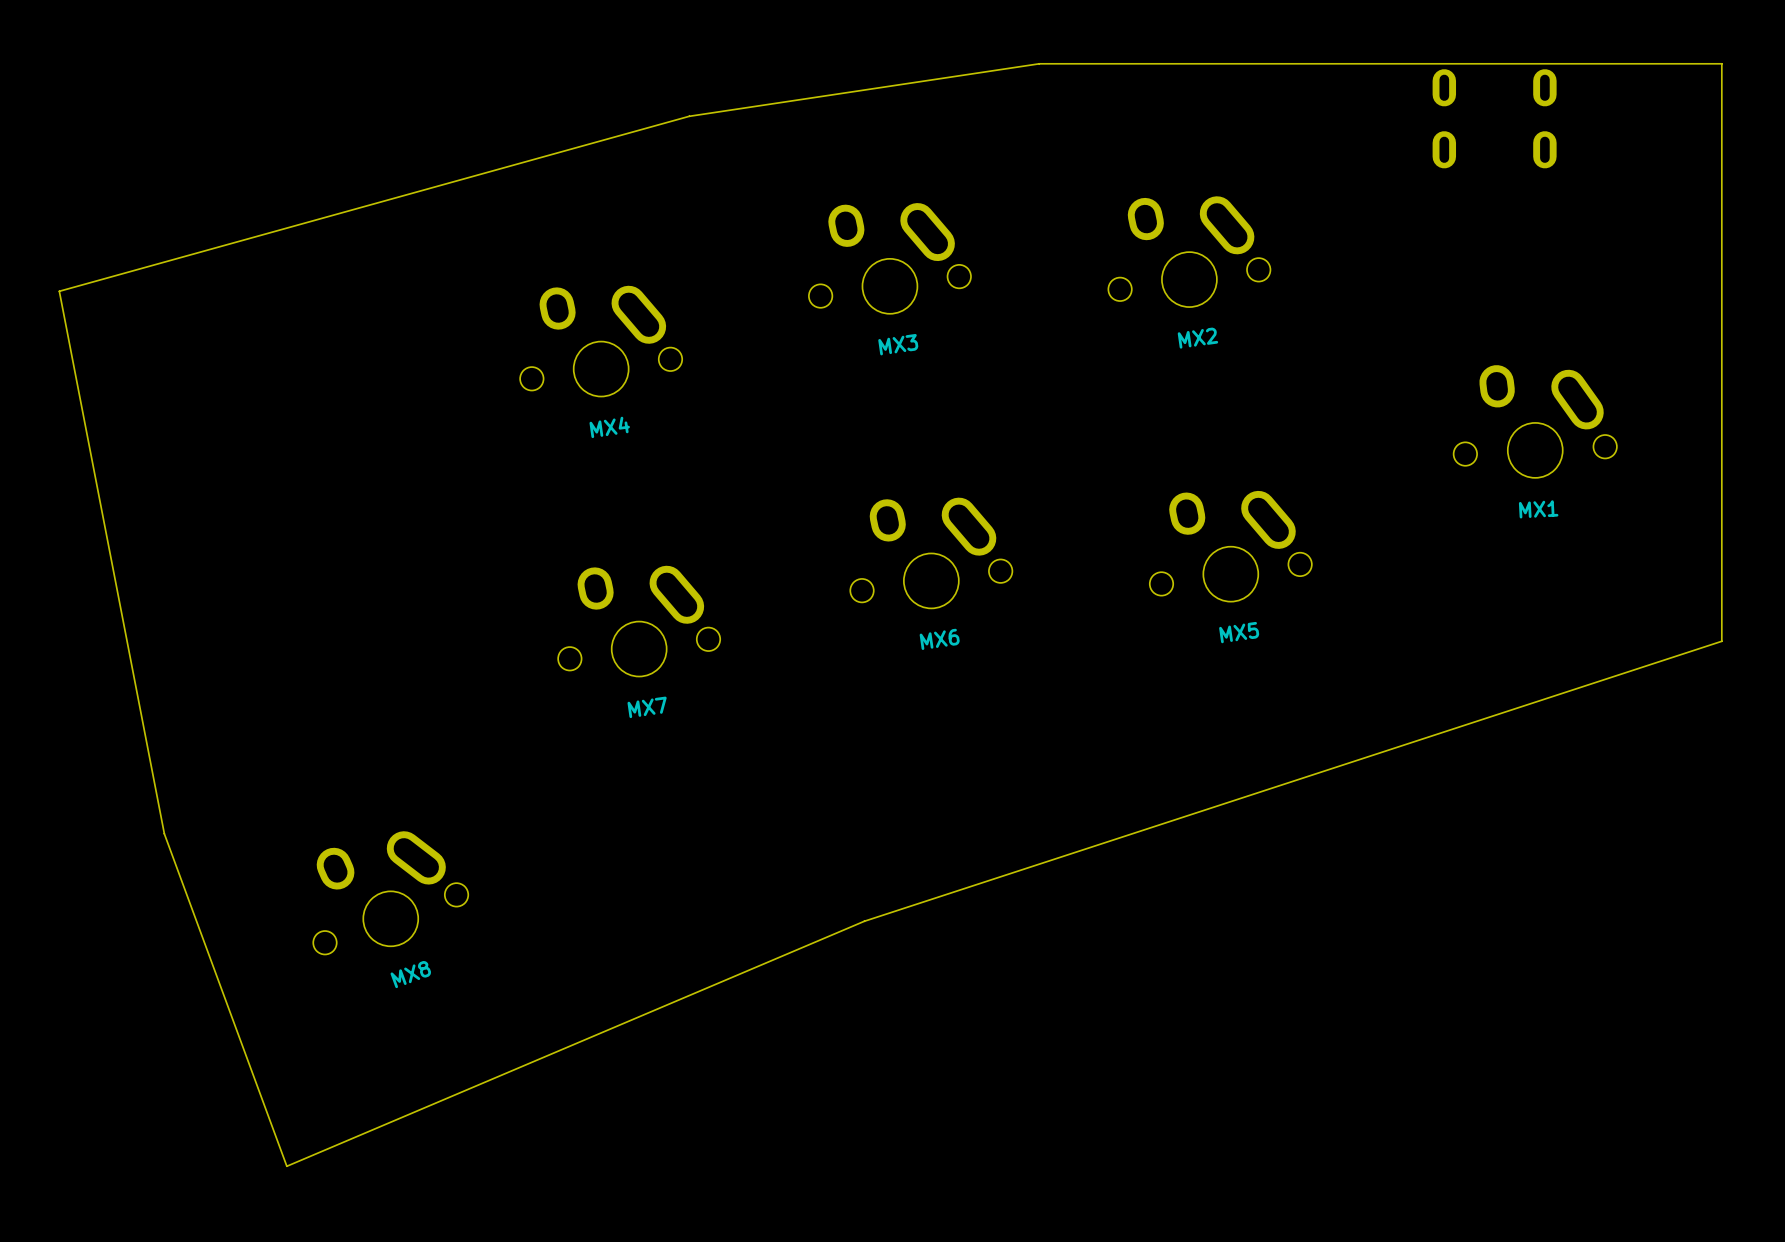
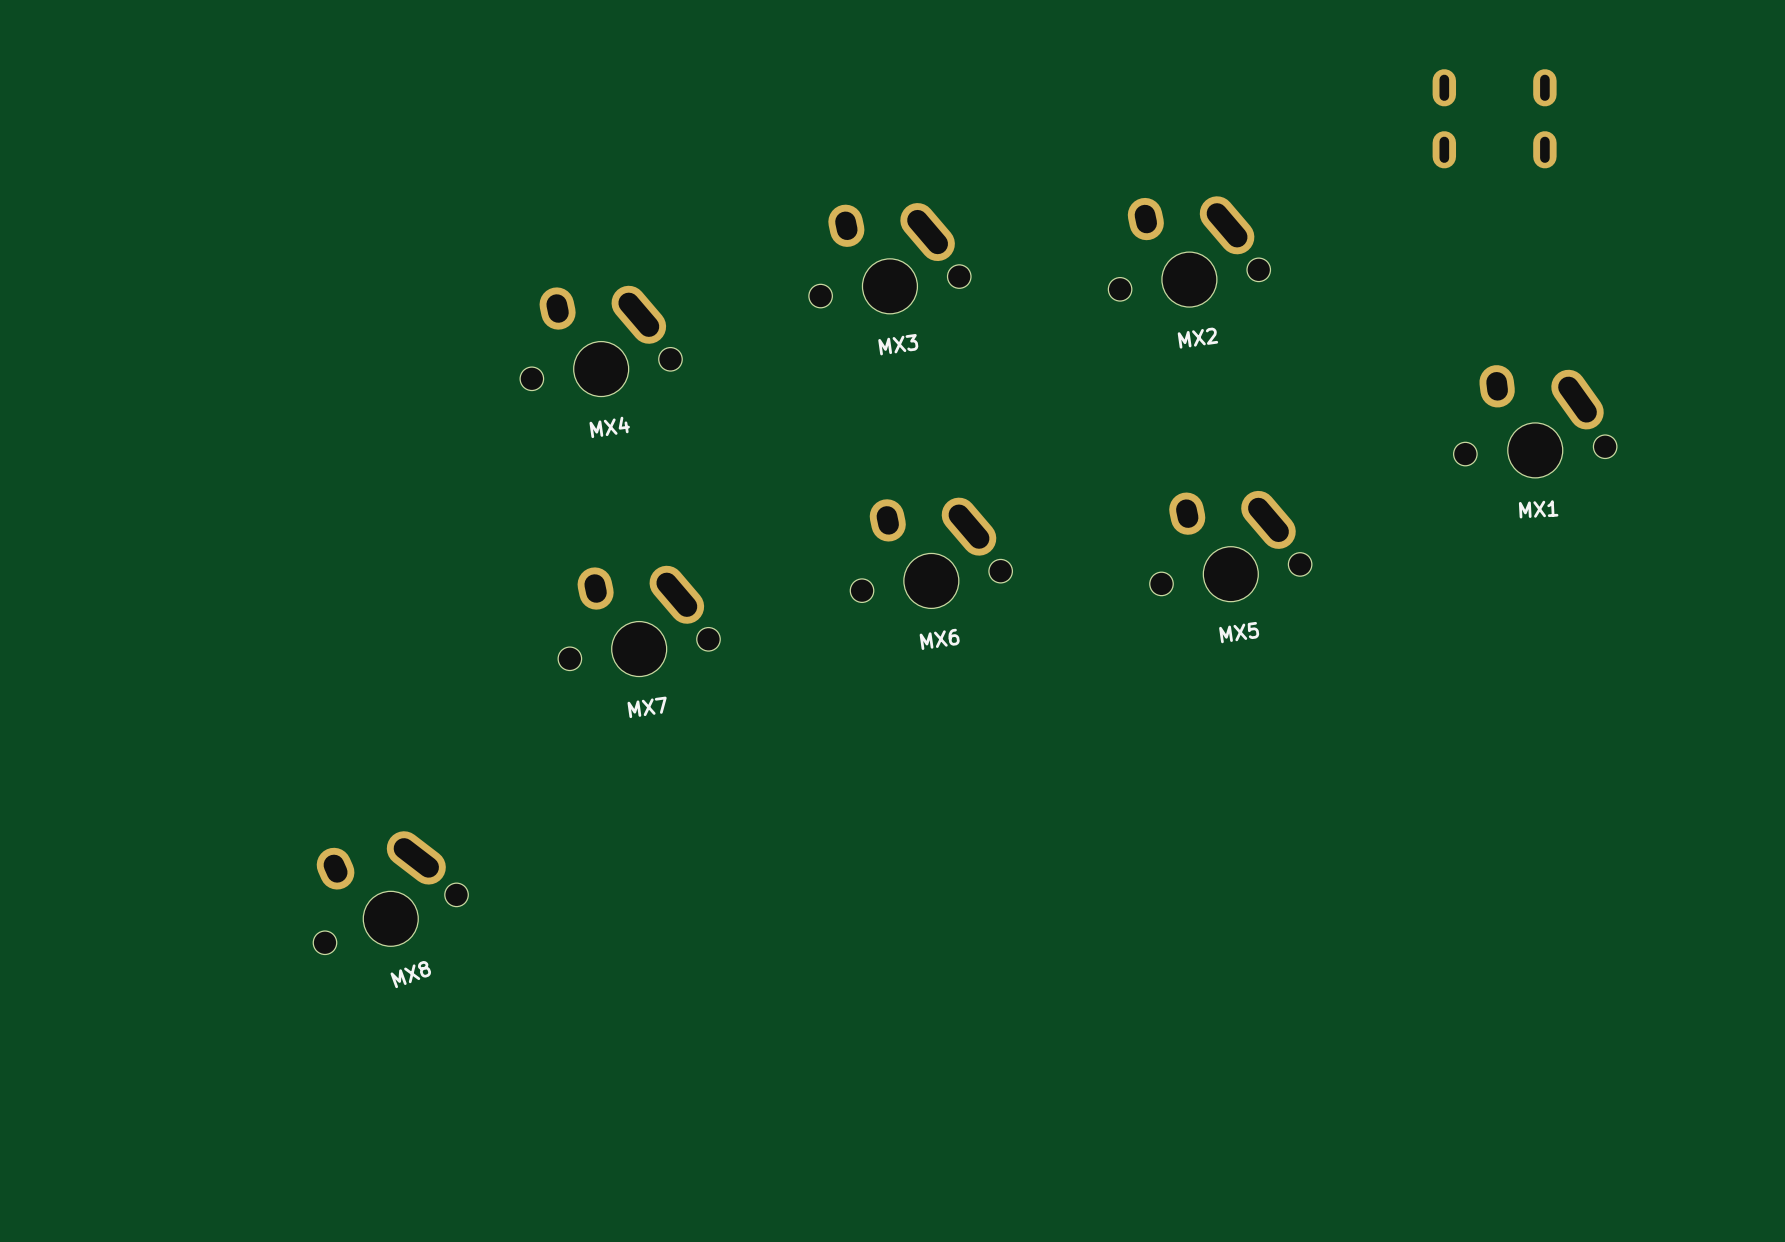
board edge: (1721, 63) (1721, 641) (864, 921) (286, 1166) (164, 833) (59, 291) (689, 116) (1039, 63) (1721, 63) -> none

